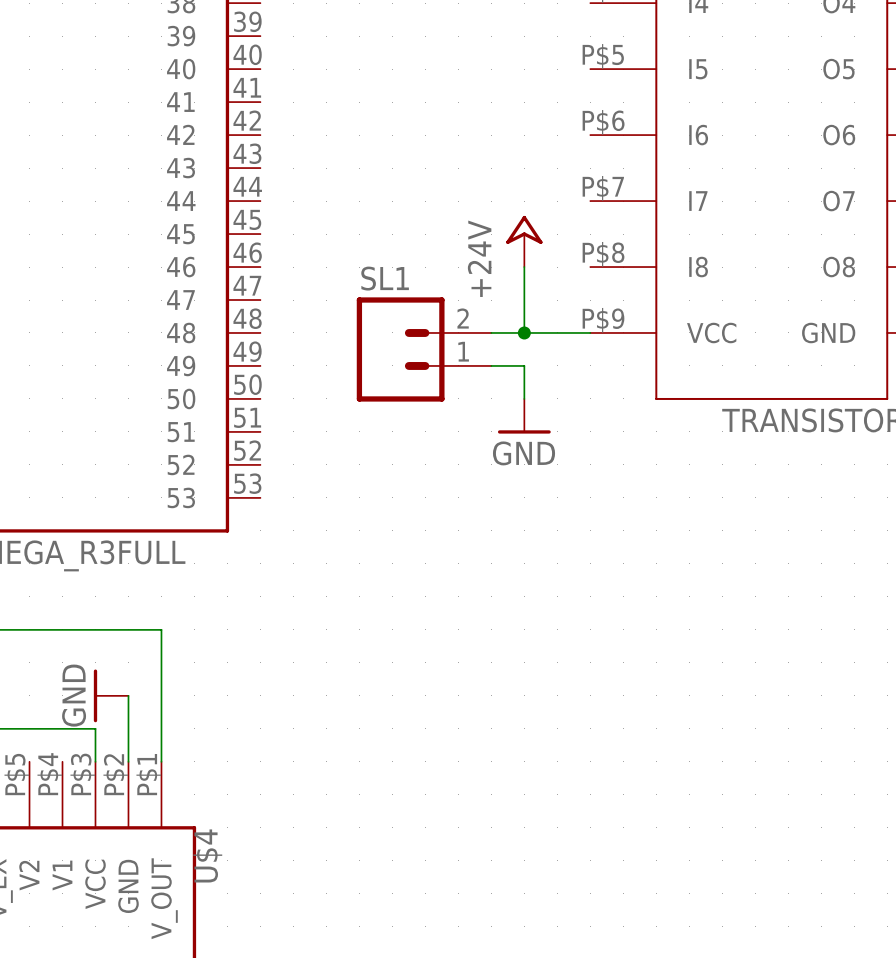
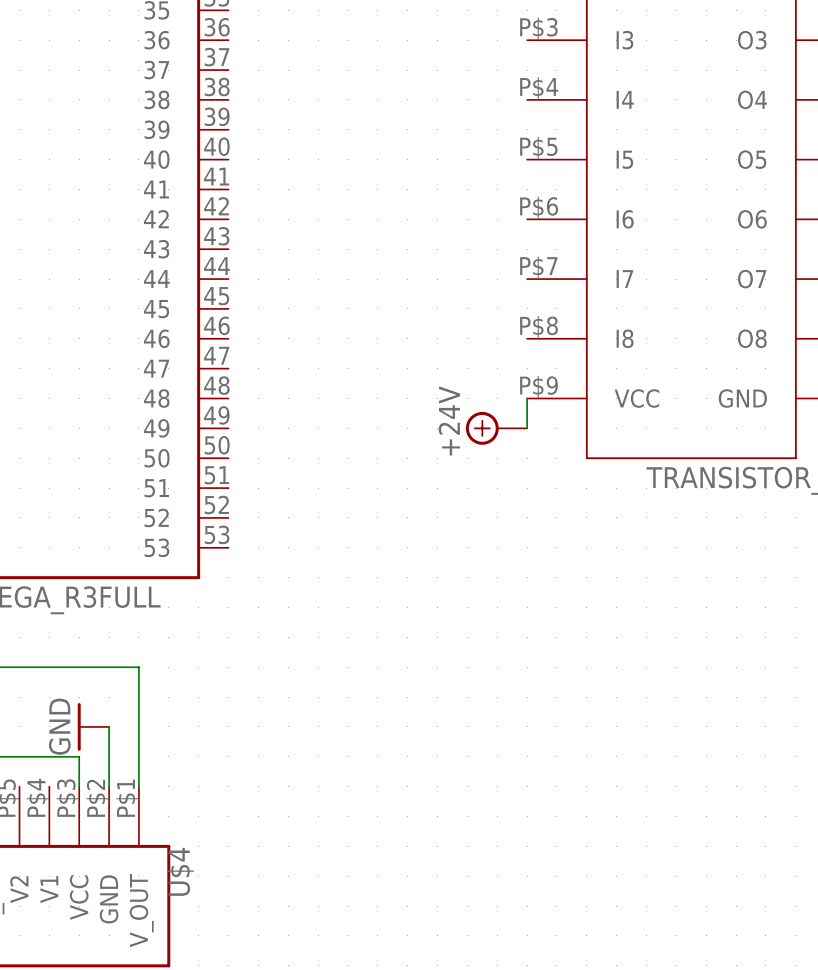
power symbol: +24V (524, 241) -> none
wire: (524, 267) (524, 332) -> none
wire: (491, 332) (590, 332) -> (527, 428) (527, 398)
junction: (524, 332) -> none
SL1: (424, 349) -> none
wire: (491, 365) (524, 365) (524, 398) -> none
power symbol: none -> +24V (496, 428)
power symbol: GND (524, 416) -> none

